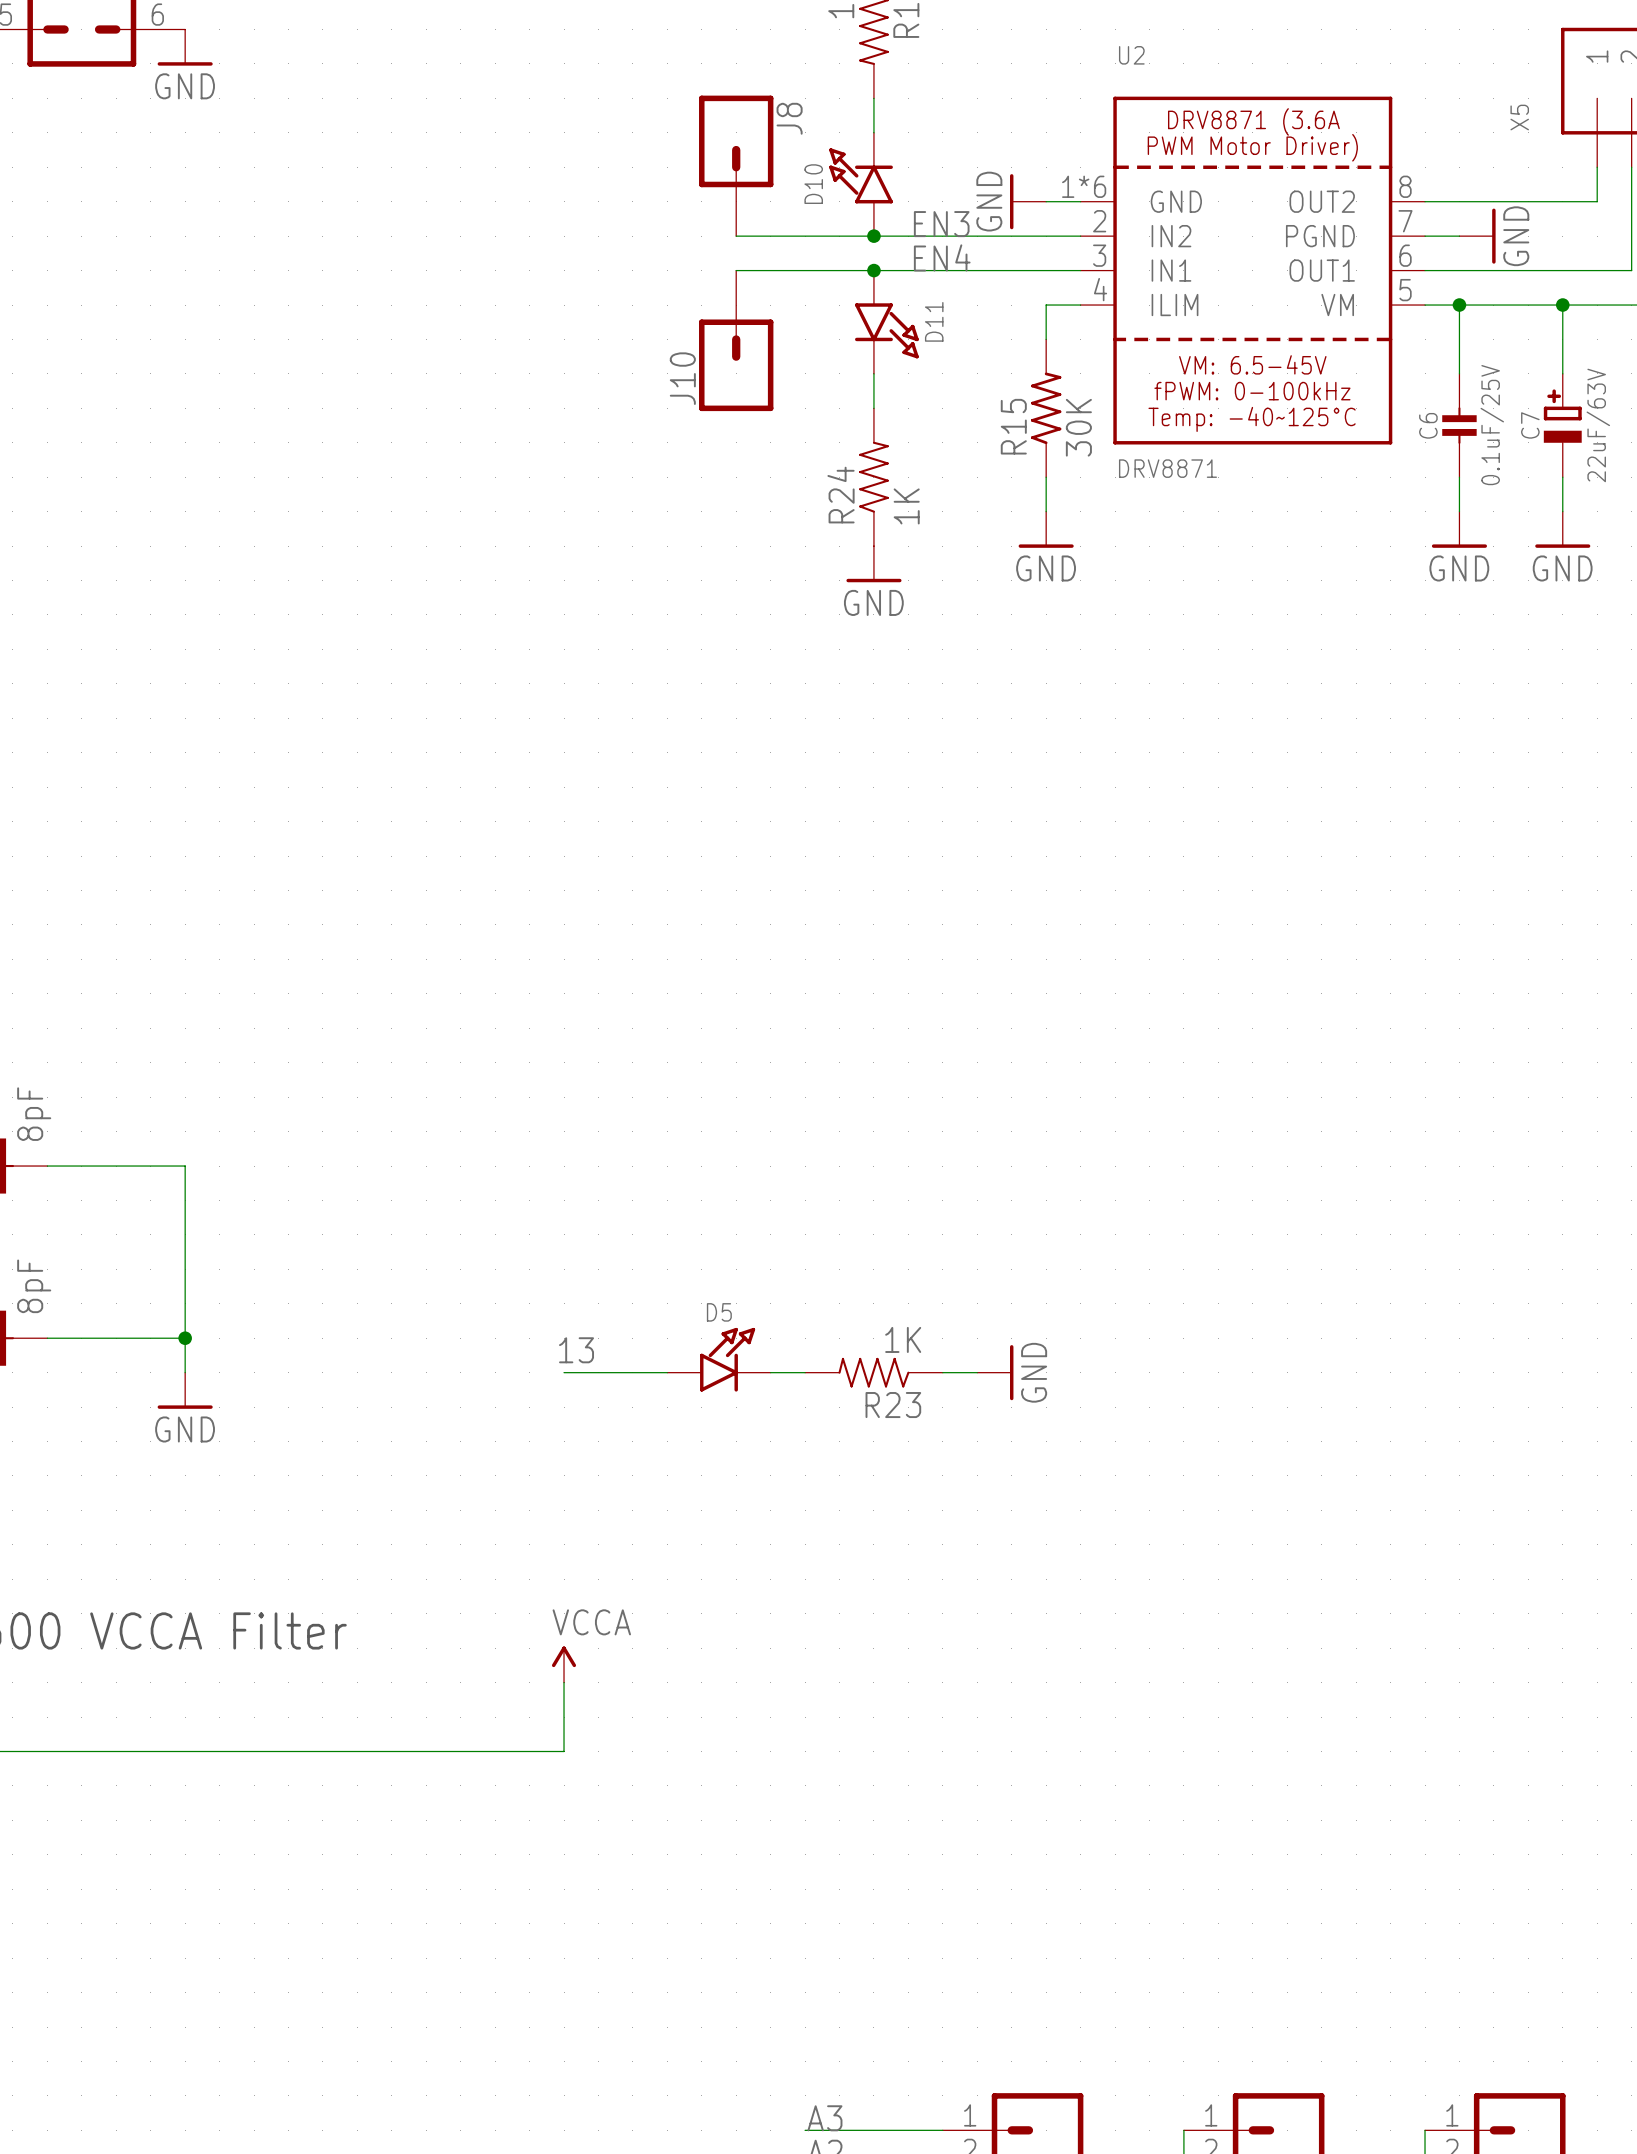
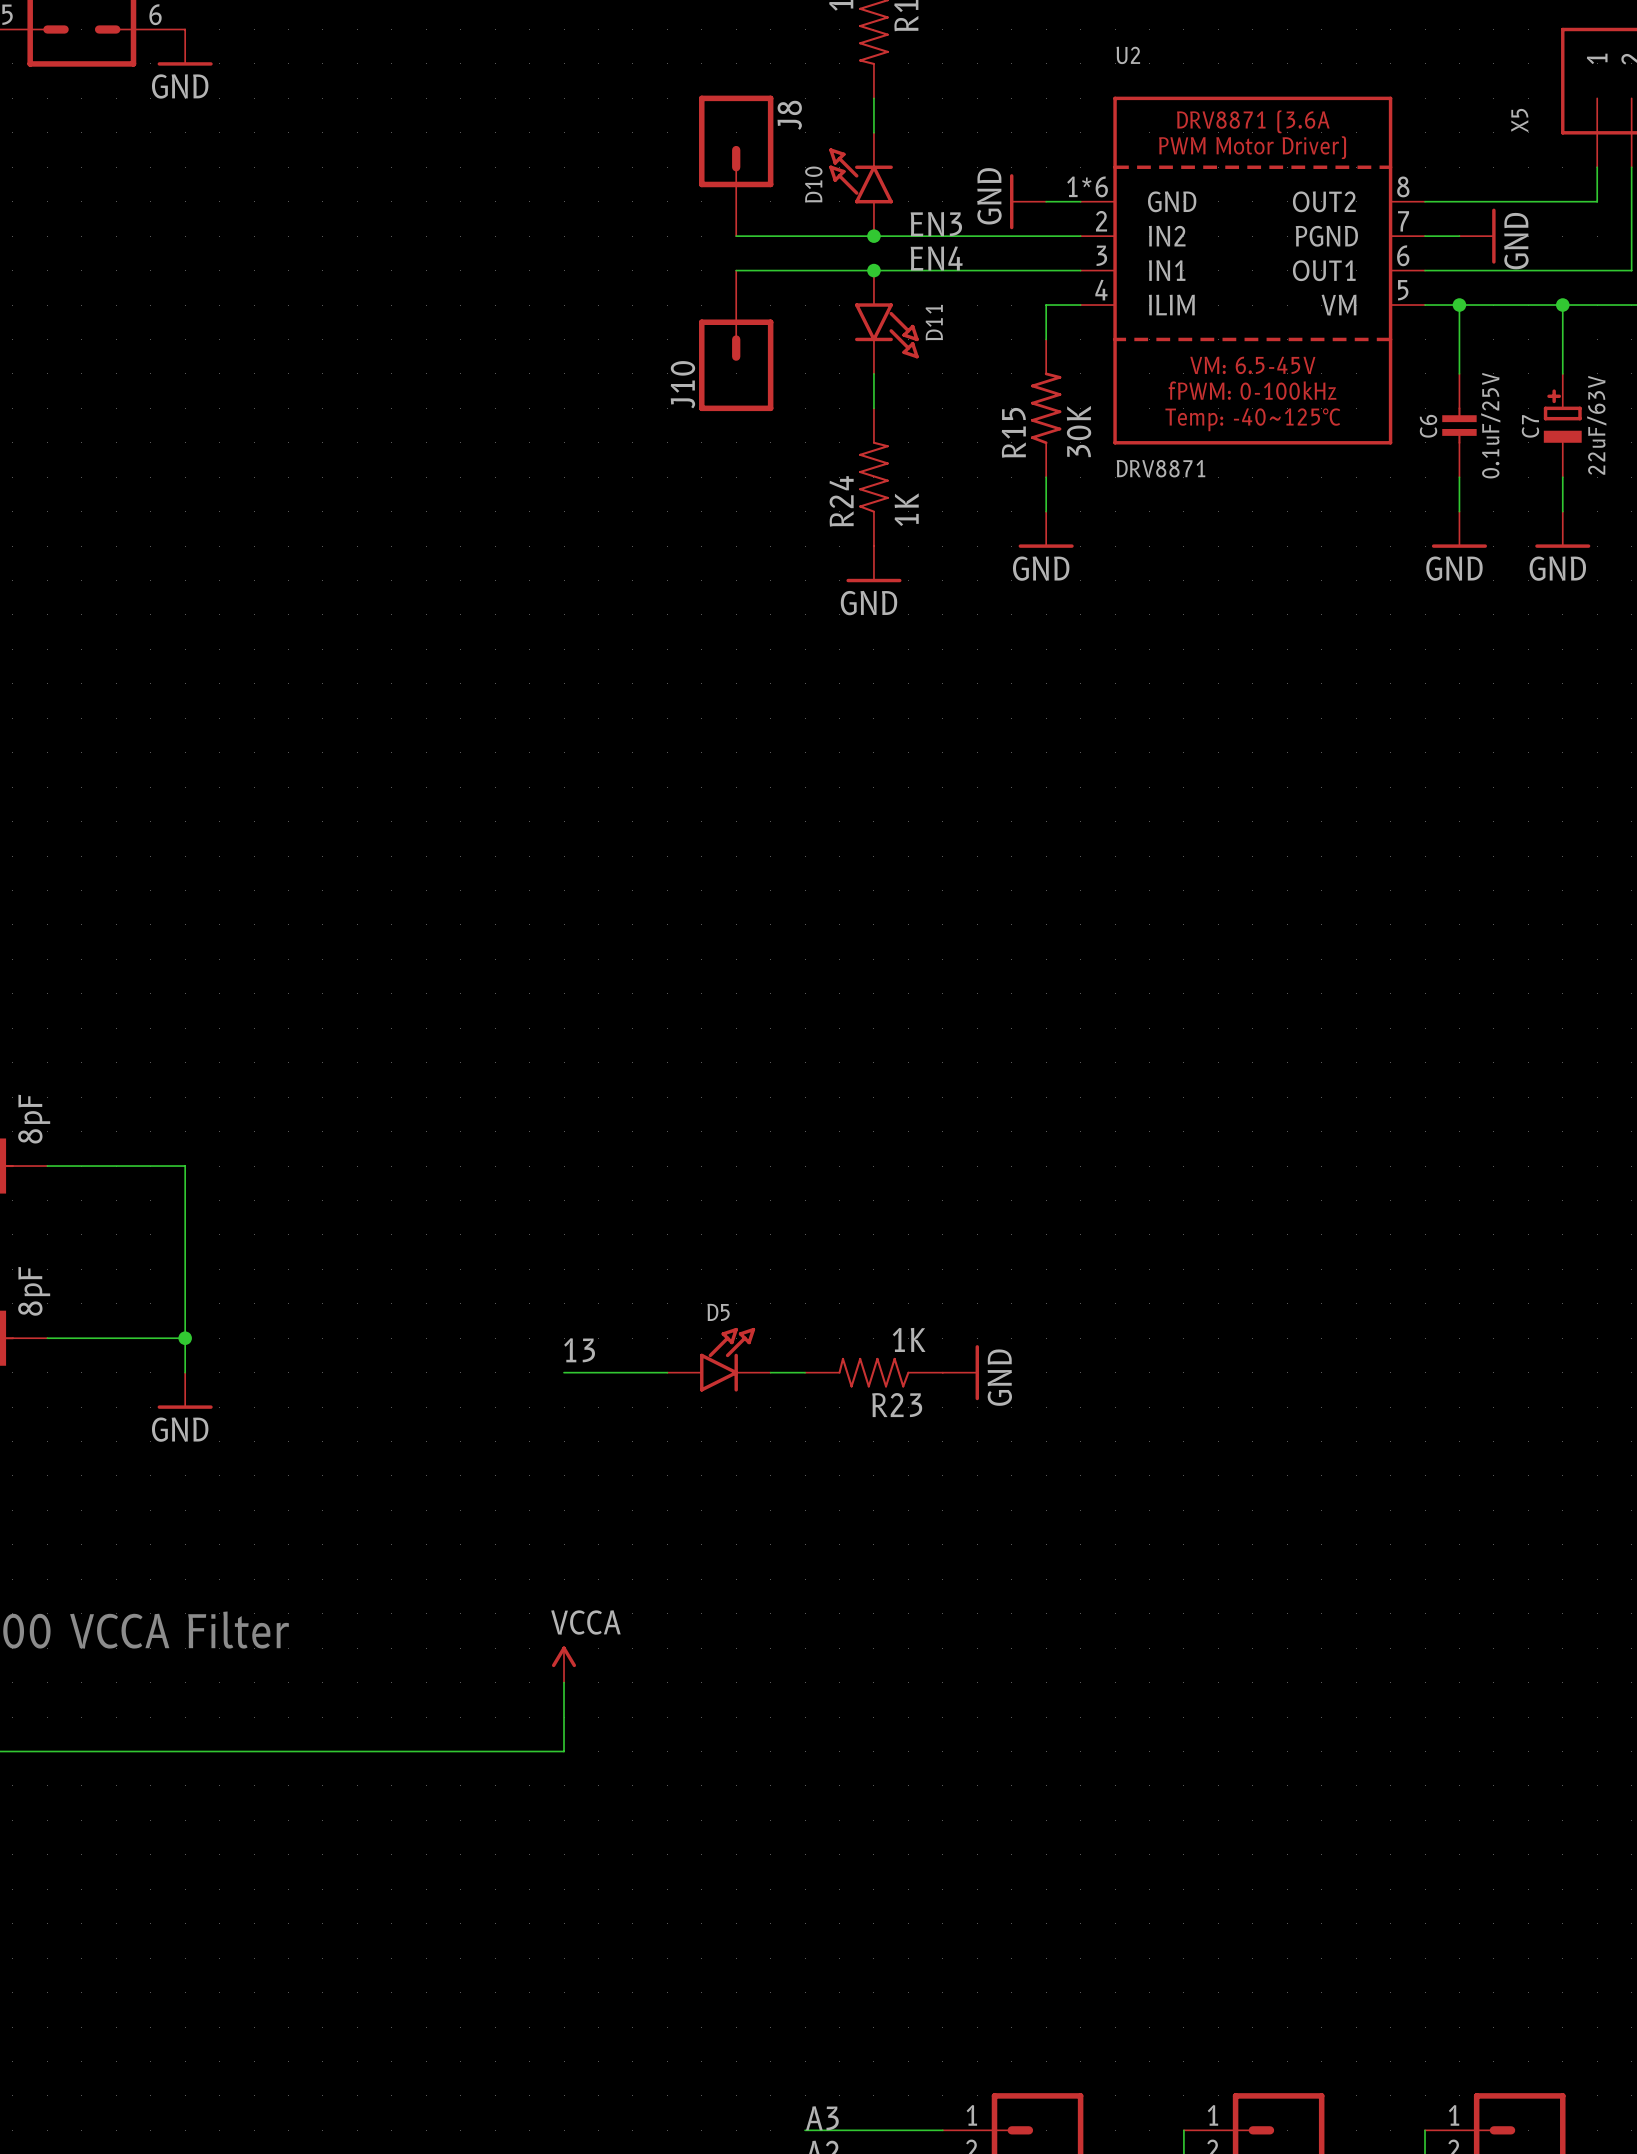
power symbol position: GND (995, 1372) -> GND (960, 1372)

